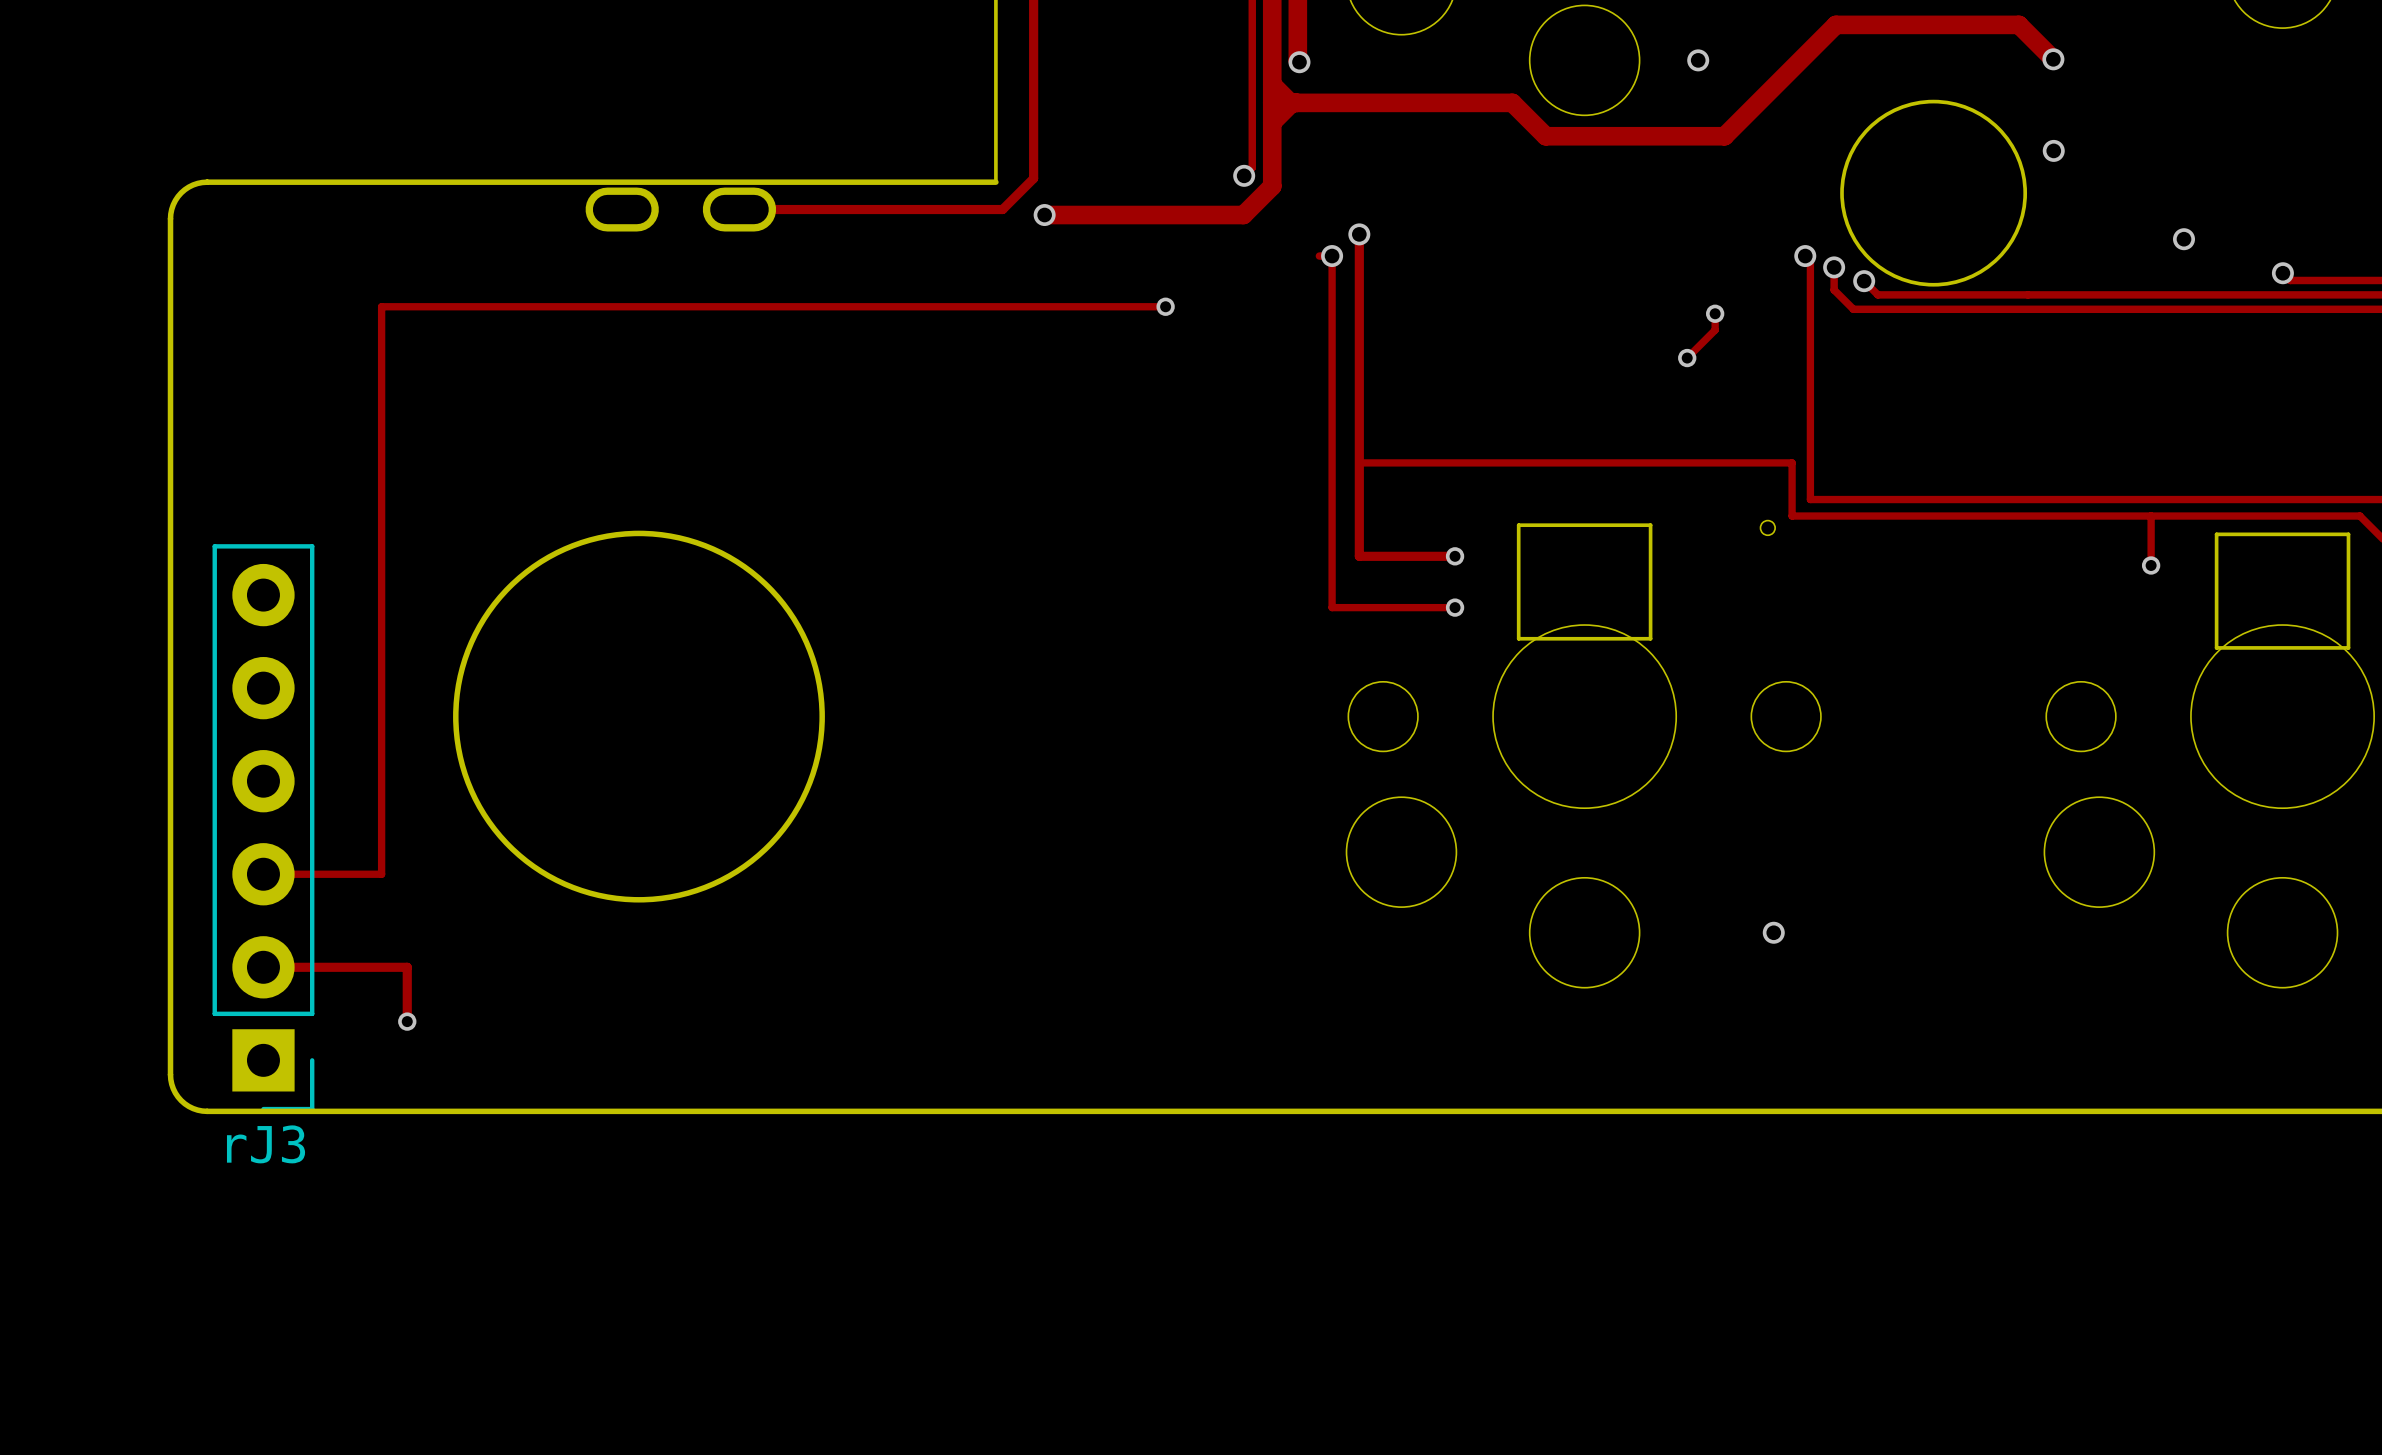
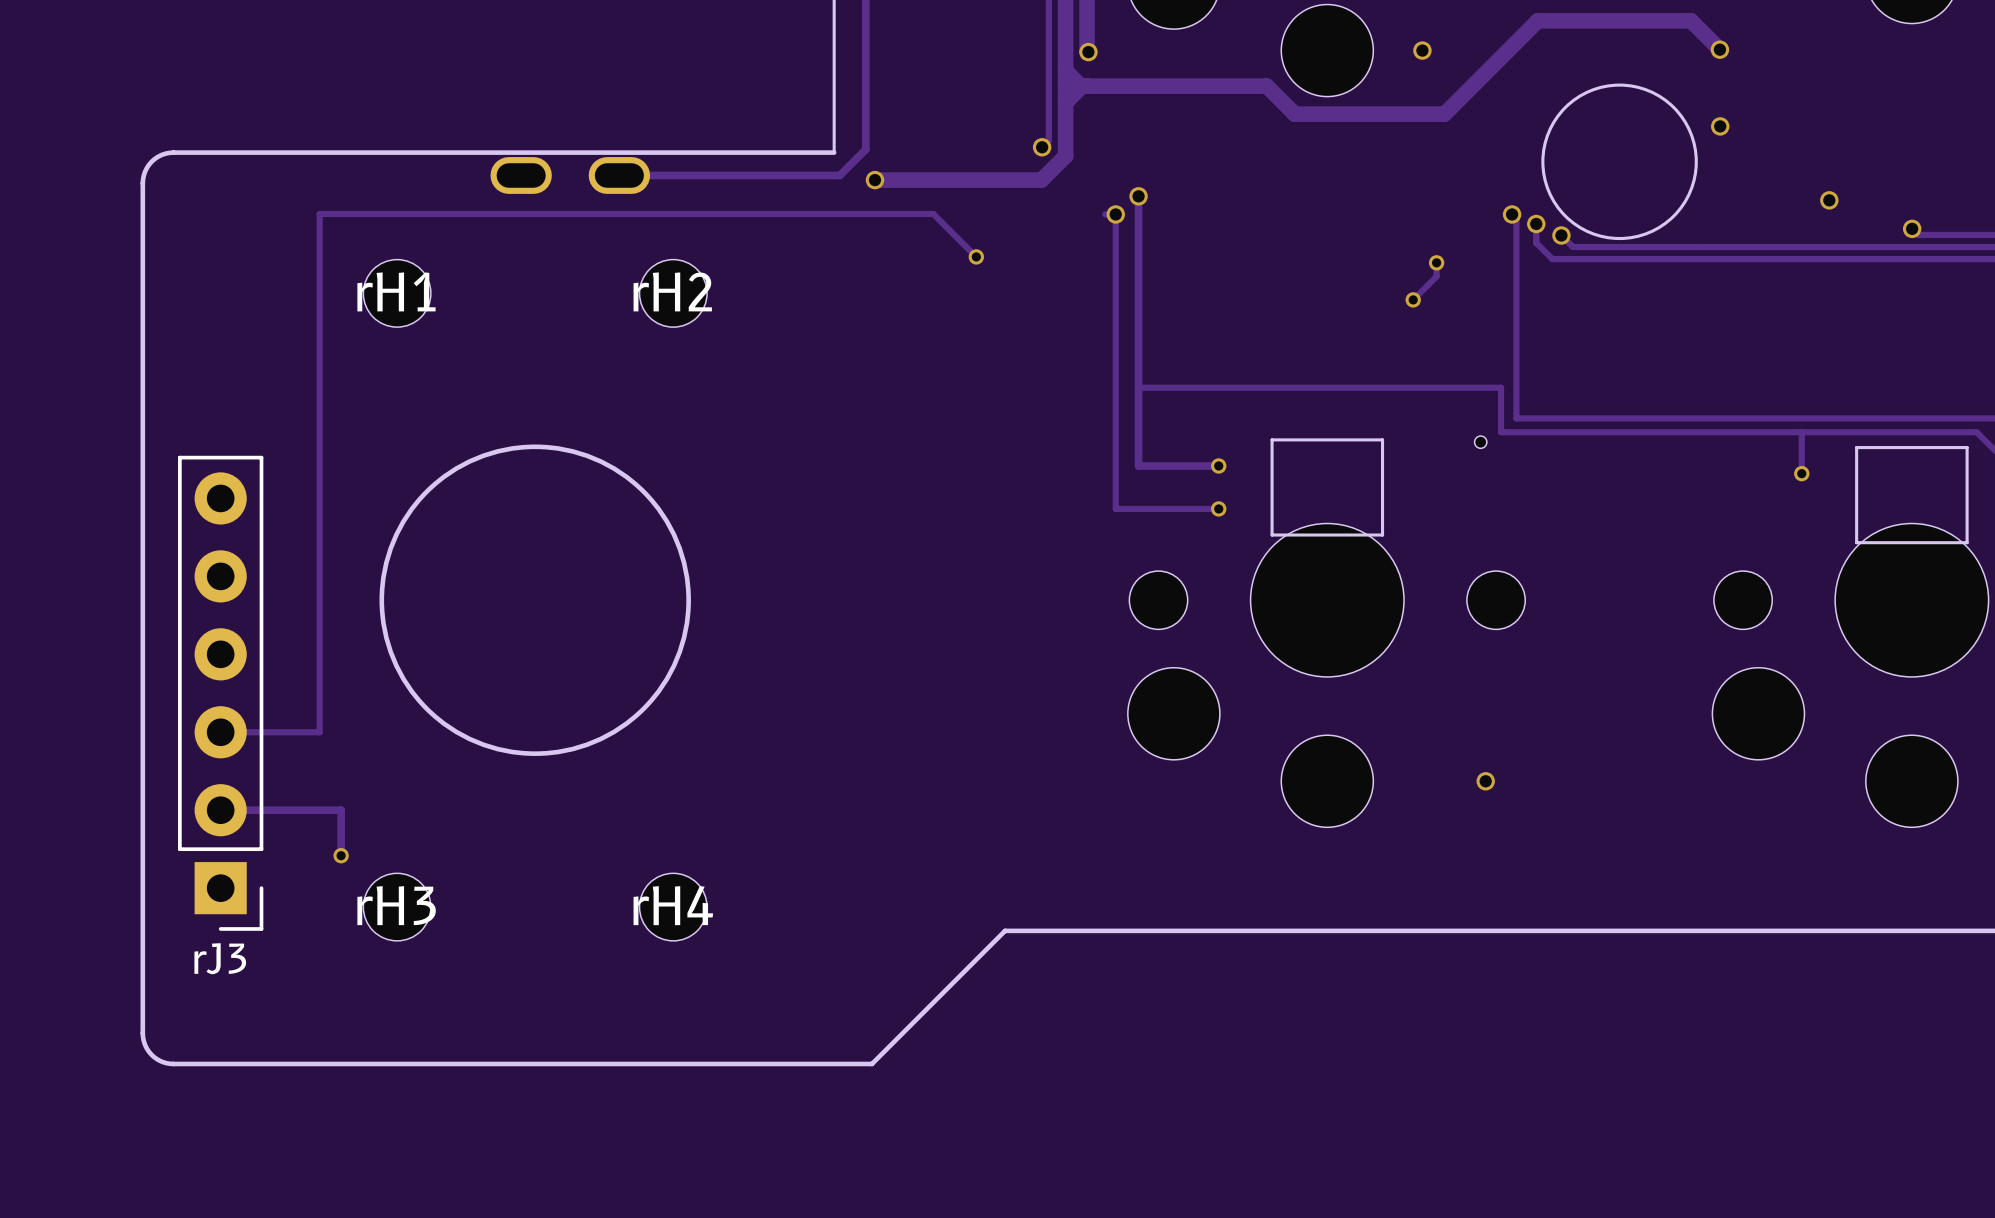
track: (381, 306) (1165, 306) -> (319, 256) (319, 213) (933, 213) (976, 256)
rH1: none -> (397, 293)
rH2: none -> (673, 293)
board edge: (170, 1074) (173, 1088) (181, 1100) (193, 1108) (207, 1111) (1199, 1111) -> (142, 900) (143, 1040) (147, 1049) (154, 1057) (163, 1062) (173, 1063) (871, 1063) (1005, 930)
rH3: none -> (397, 907)
rH4: none -> (673, 907)

